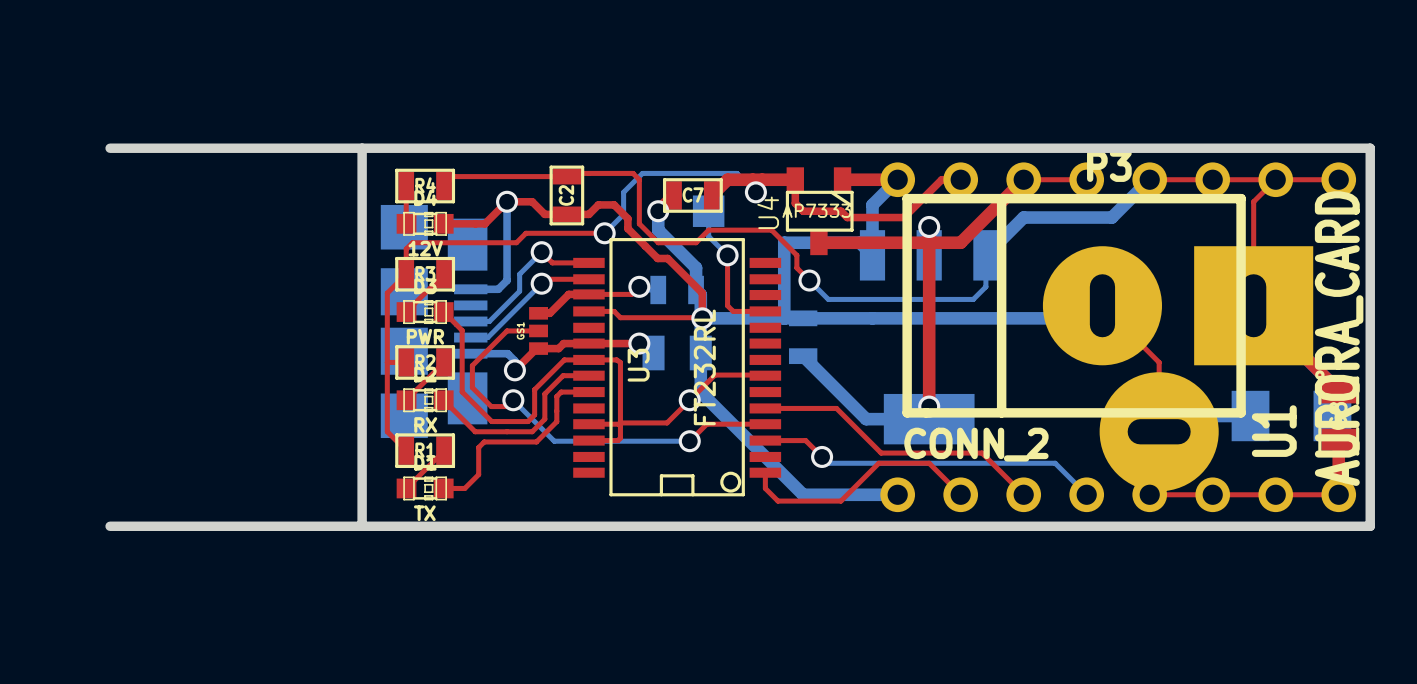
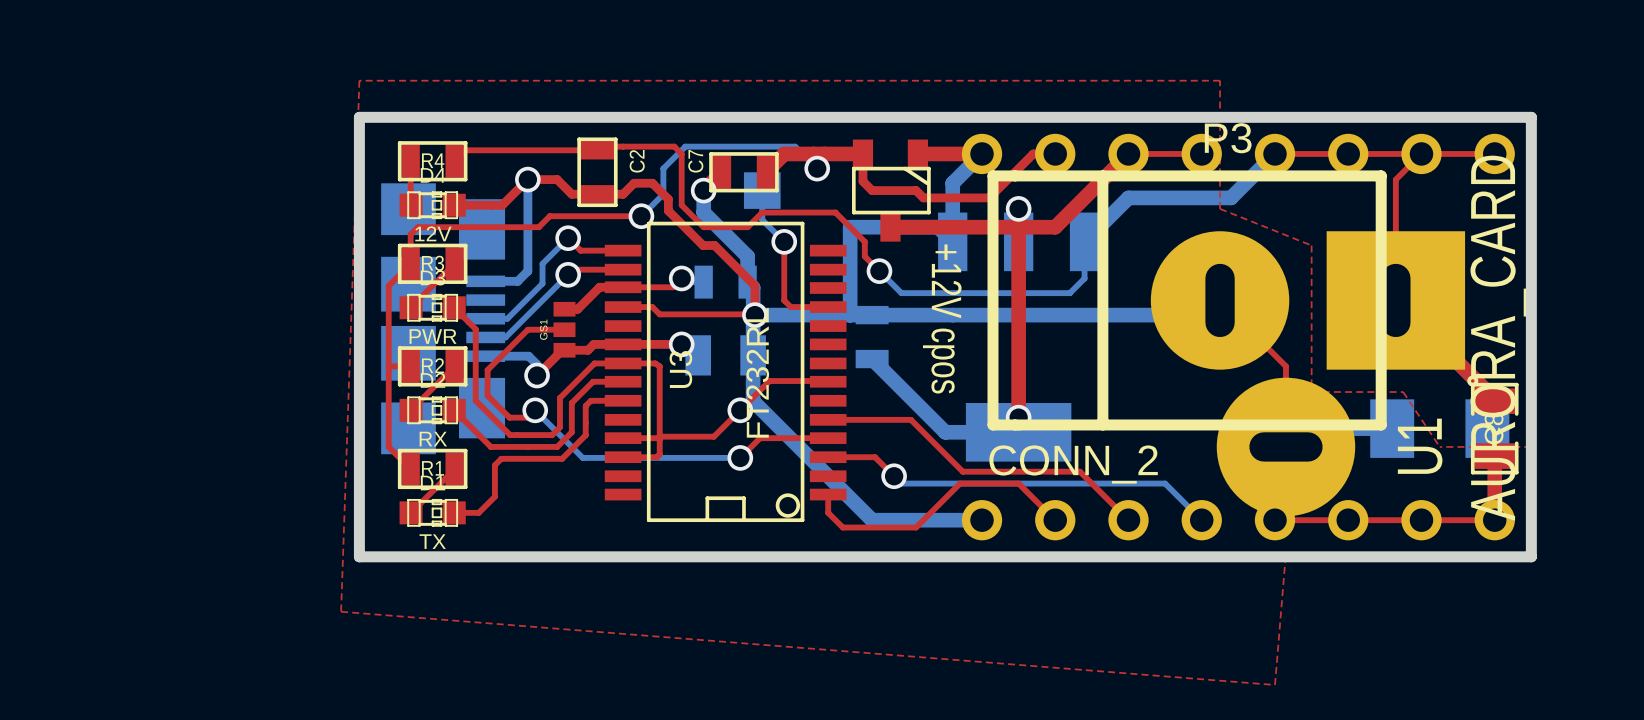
top zone outline: none -> (359, 80) (1220, 80) (1220, 208) (1311, 245) (1311, 392) (1403, 392) (1439, 446) (1531, 446) (1531, 556) (1285, 556) (1275, 684) (341, 611) (359, 80)
board edge: (110, 148) (362, 148) -> none
C2 name position: C2 (566, 195) -> C2 (637, 161)
C7 name rotation: 0° (693, 195) -> 90° counterclockwise (695, 161)
C7 name position: C7 (693, 195) -> C7 (695, 161)
U4 value: AP7333 (816, 210) -> none
U4 name: U4 (768, 212) -> none
text: none -> +12V cpos (942, 318)
board edge: (110, 526) (362, 526) -> none

